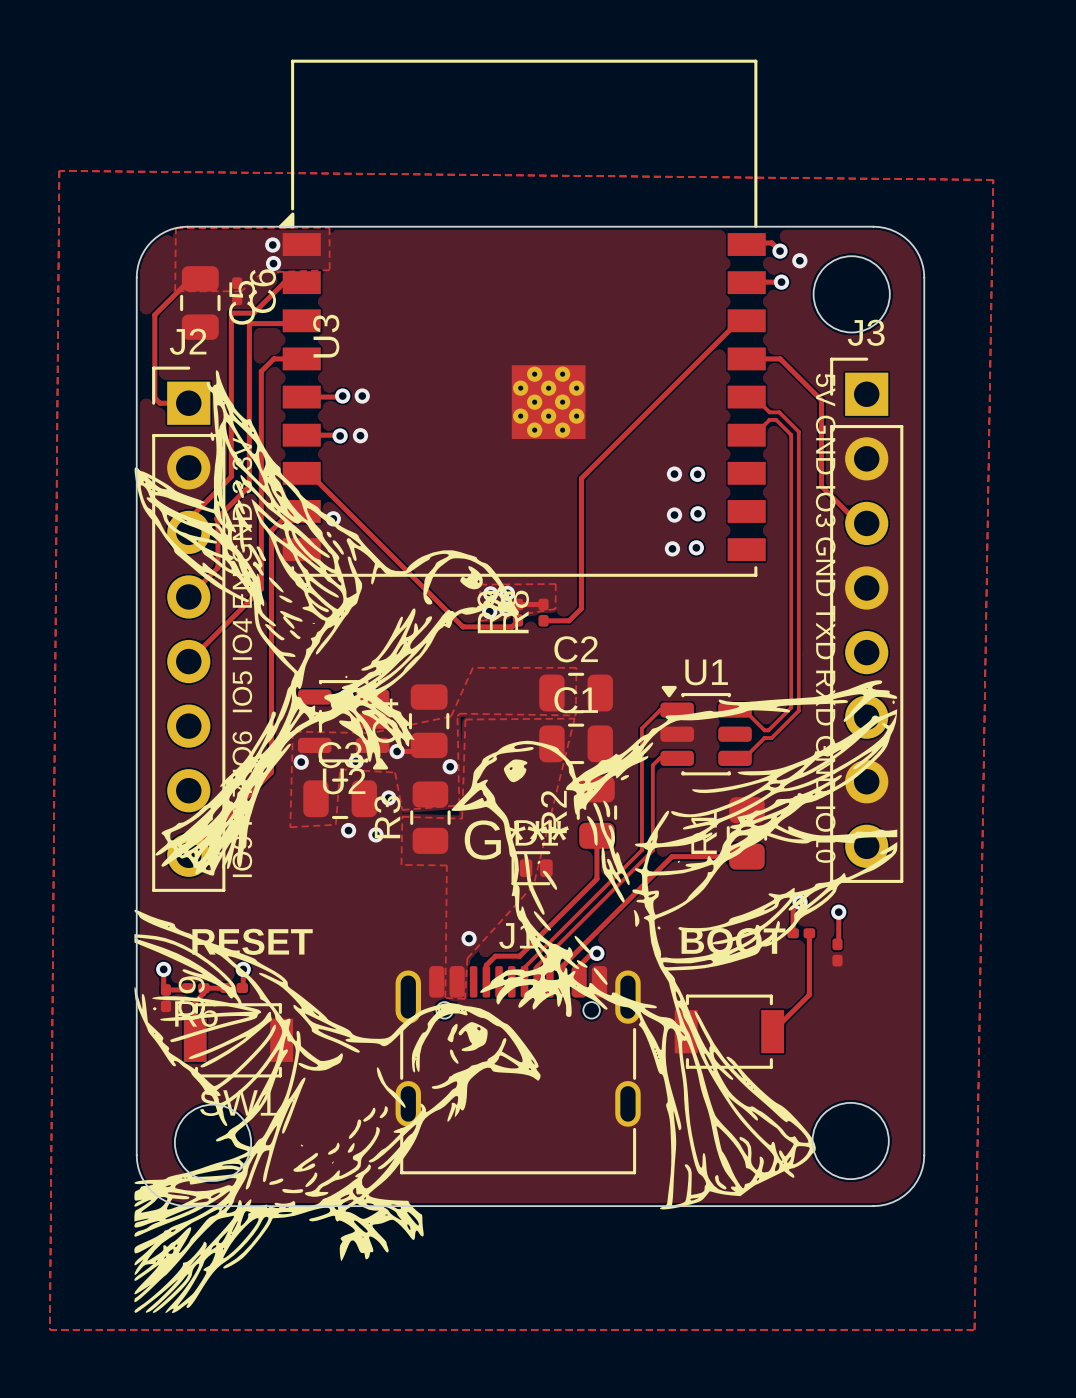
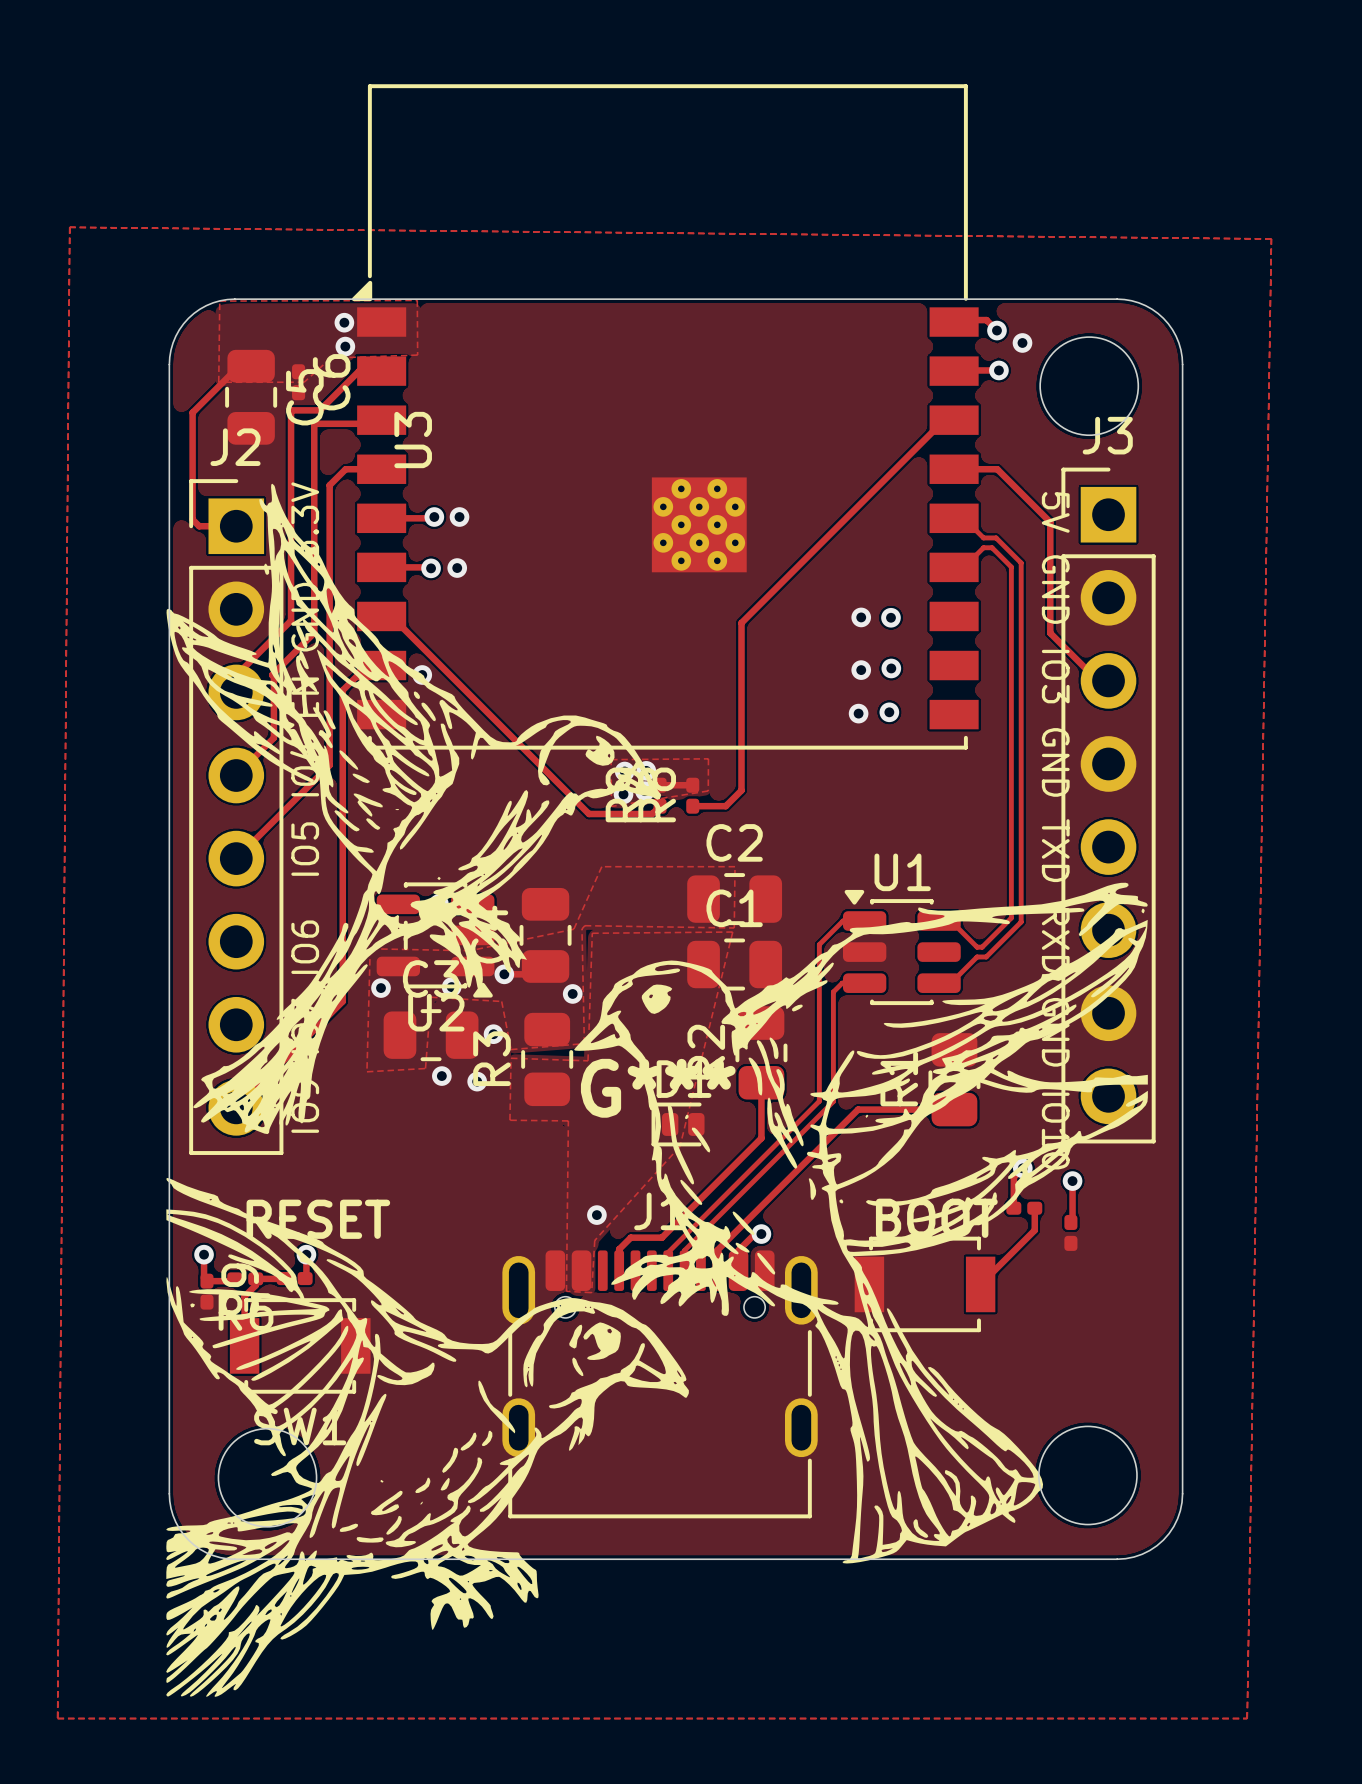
track: (809, 950) (809, 994) (772, 1031) -> (1034, 1230) (980, 1284)
part position: (729, 1031) -> (925, 1284)

